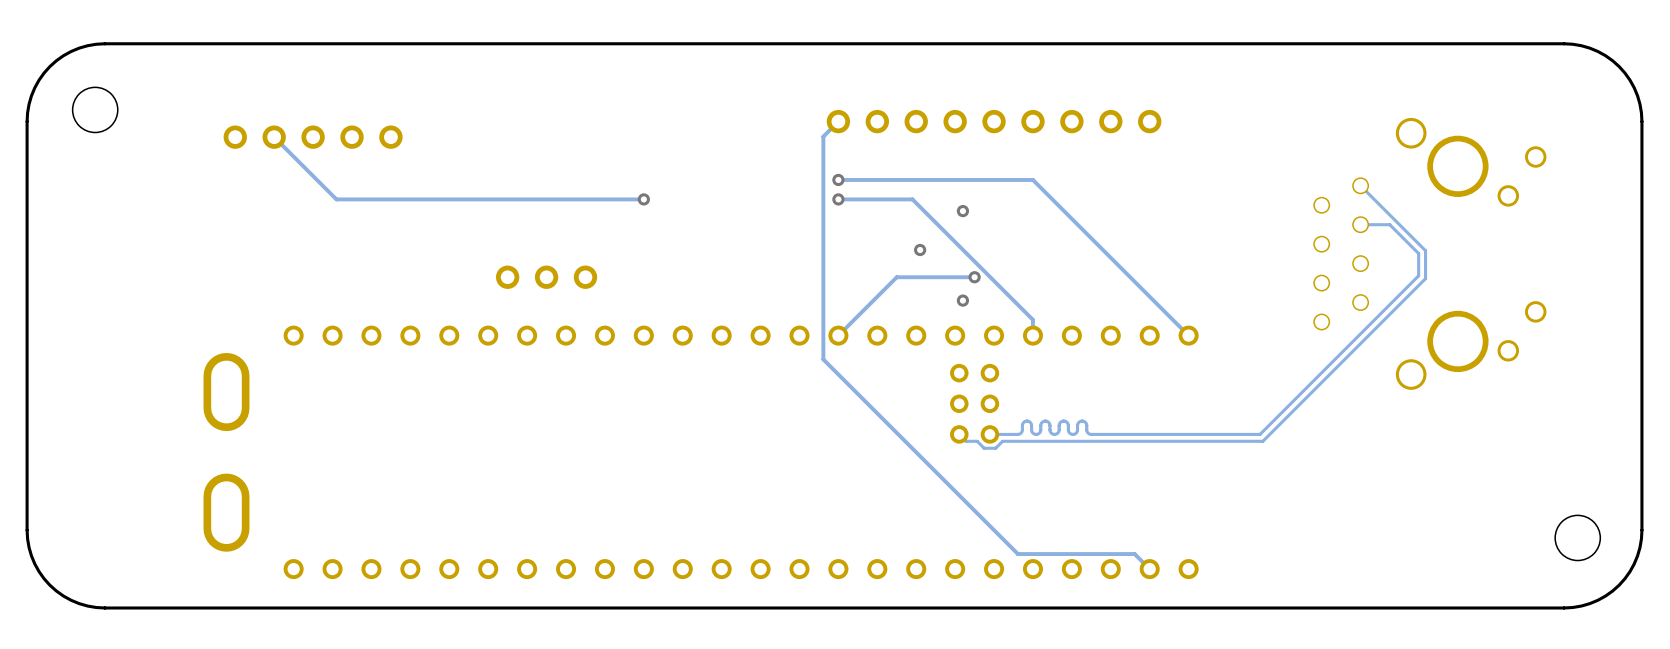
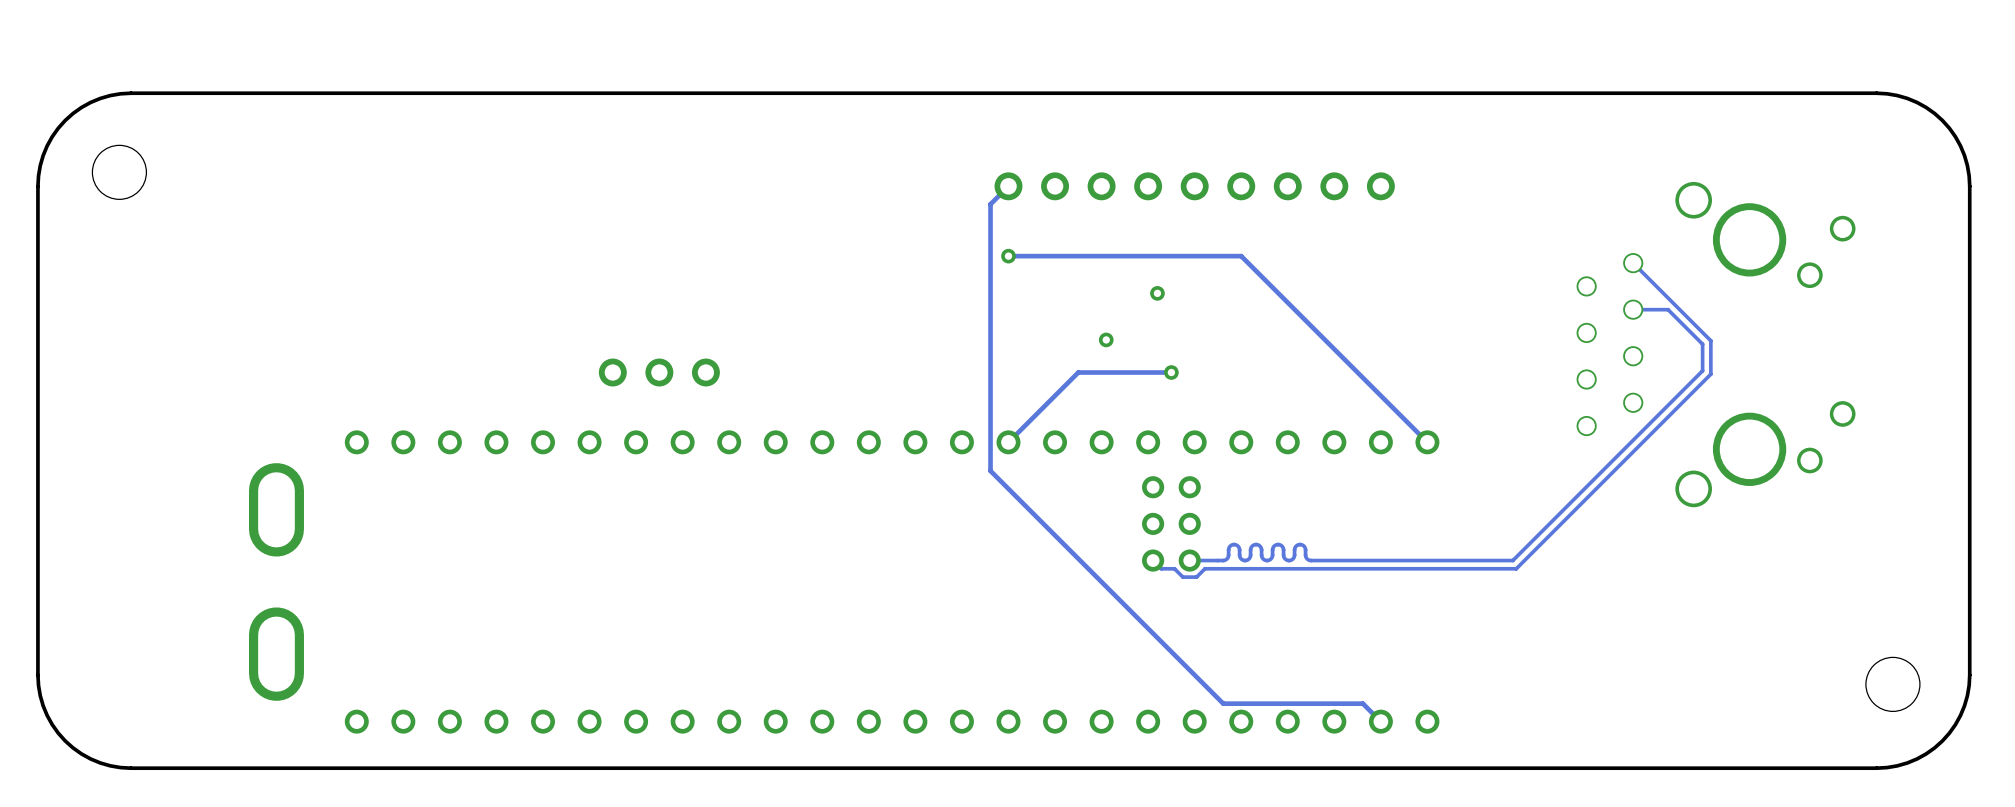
track: (274, 137) (336, 199) (643, 199) -> none
part: (313, 137) -> none
via: (643, 199) -> none
track: (838, 199) (912, 199) (1032, 319) (1032, 335) -> none
via: (838, 199) -> none
via: (962, 300) -> none

